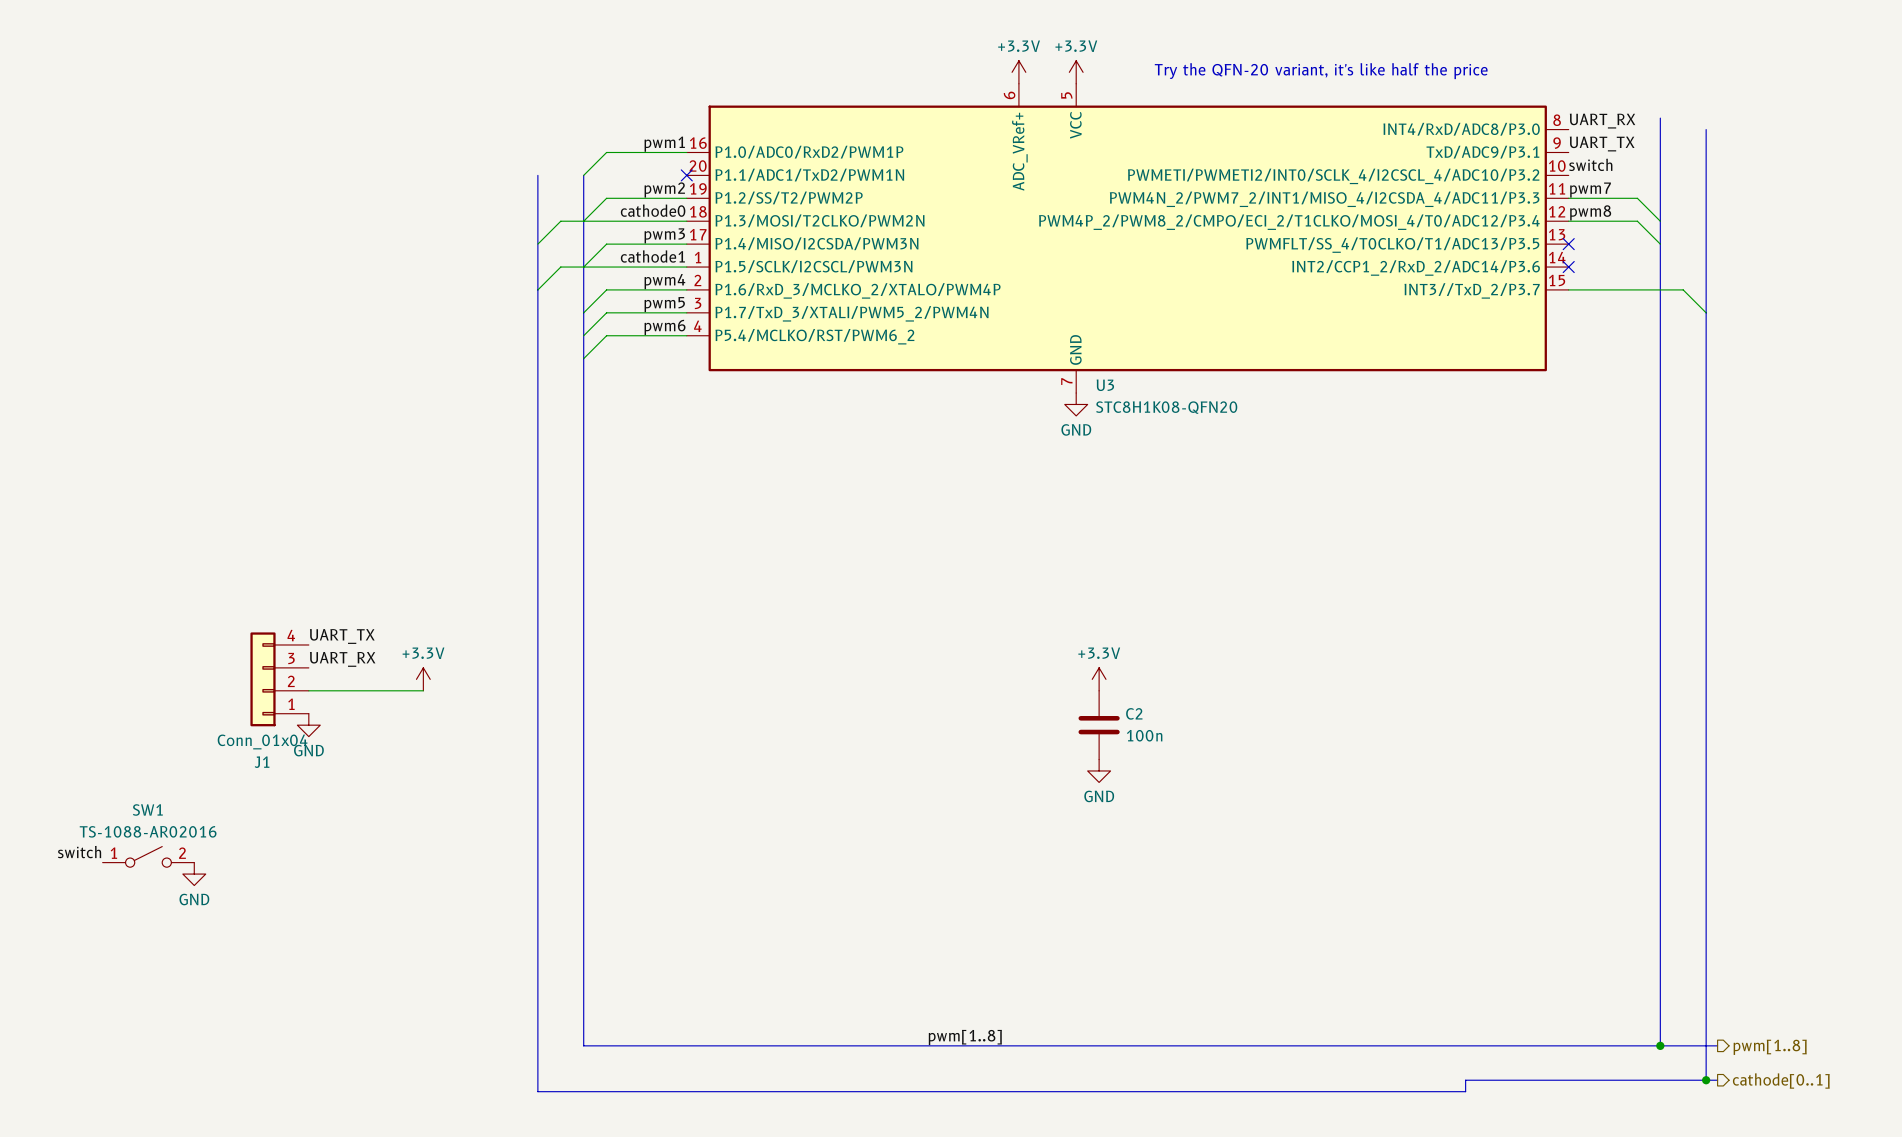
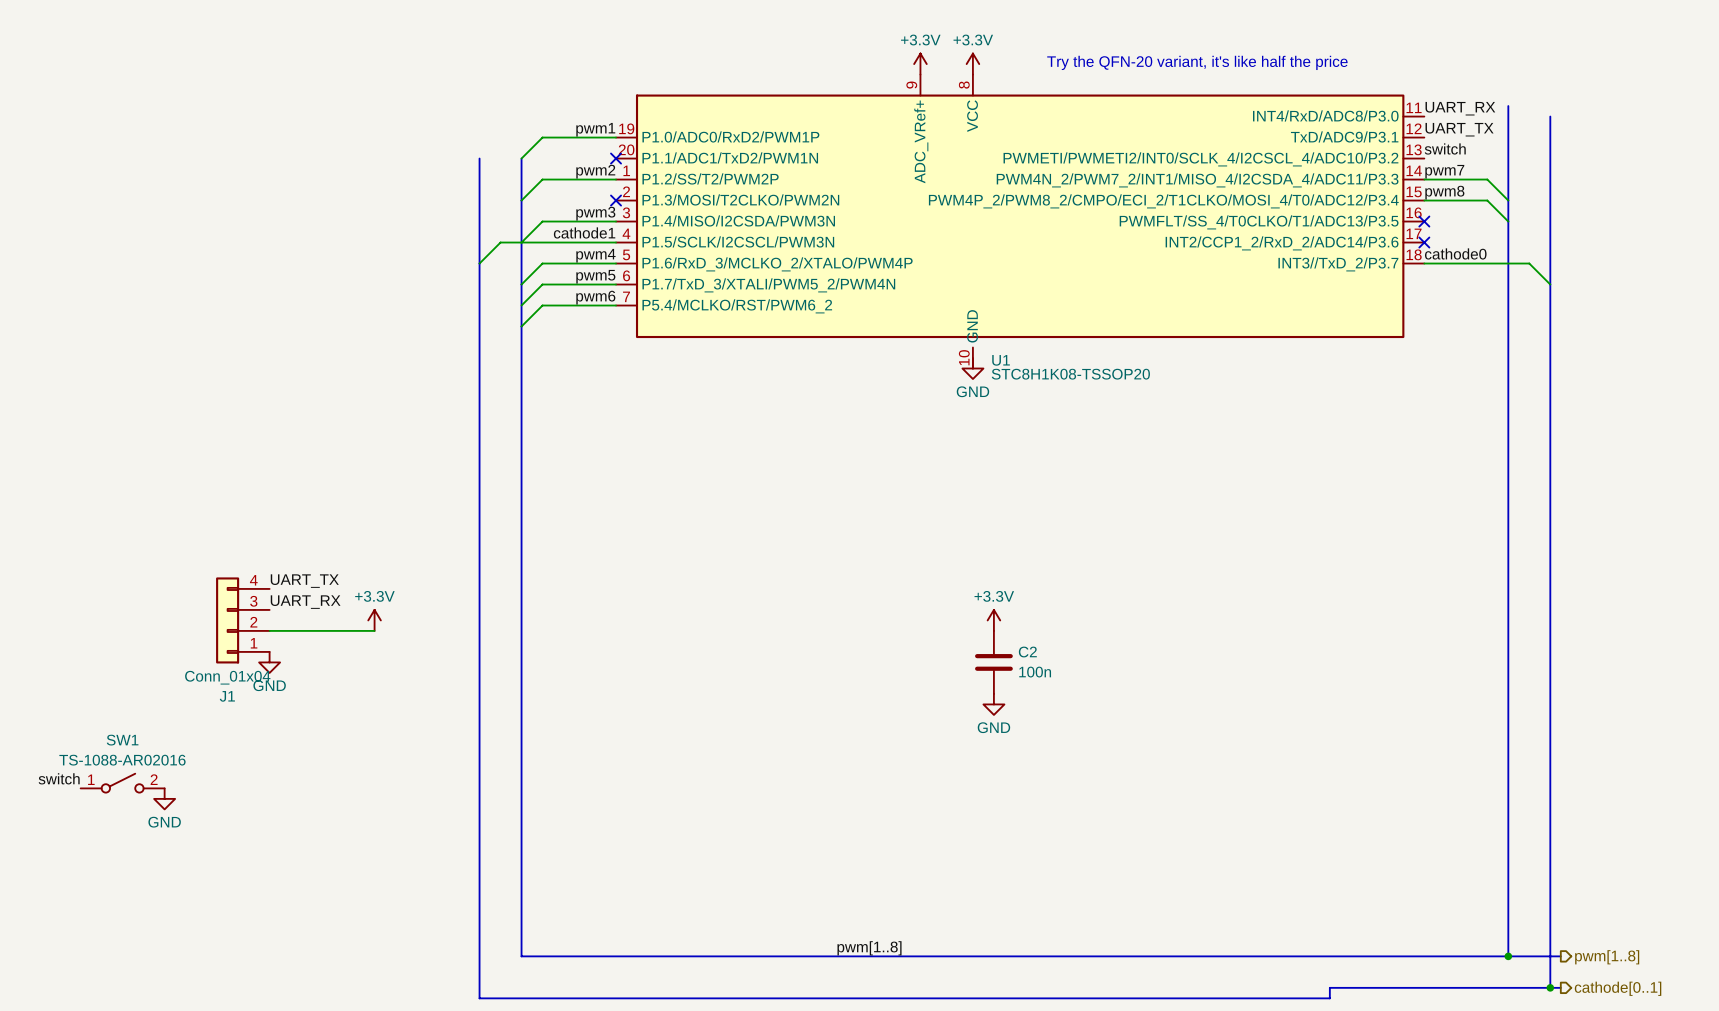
label: cathode0 (653, 210) -> none
wire: (686, 221) (560, 221) (537, 244) -> none
no-connect mark: none -> (616, 200)
U3: STC8H1K08-QFN20 (1127, 238) -> none
U1: none -> STC8H1K08-TSSOP20 (1020, 221)
label: none -> cathode0 (1455, 253)

